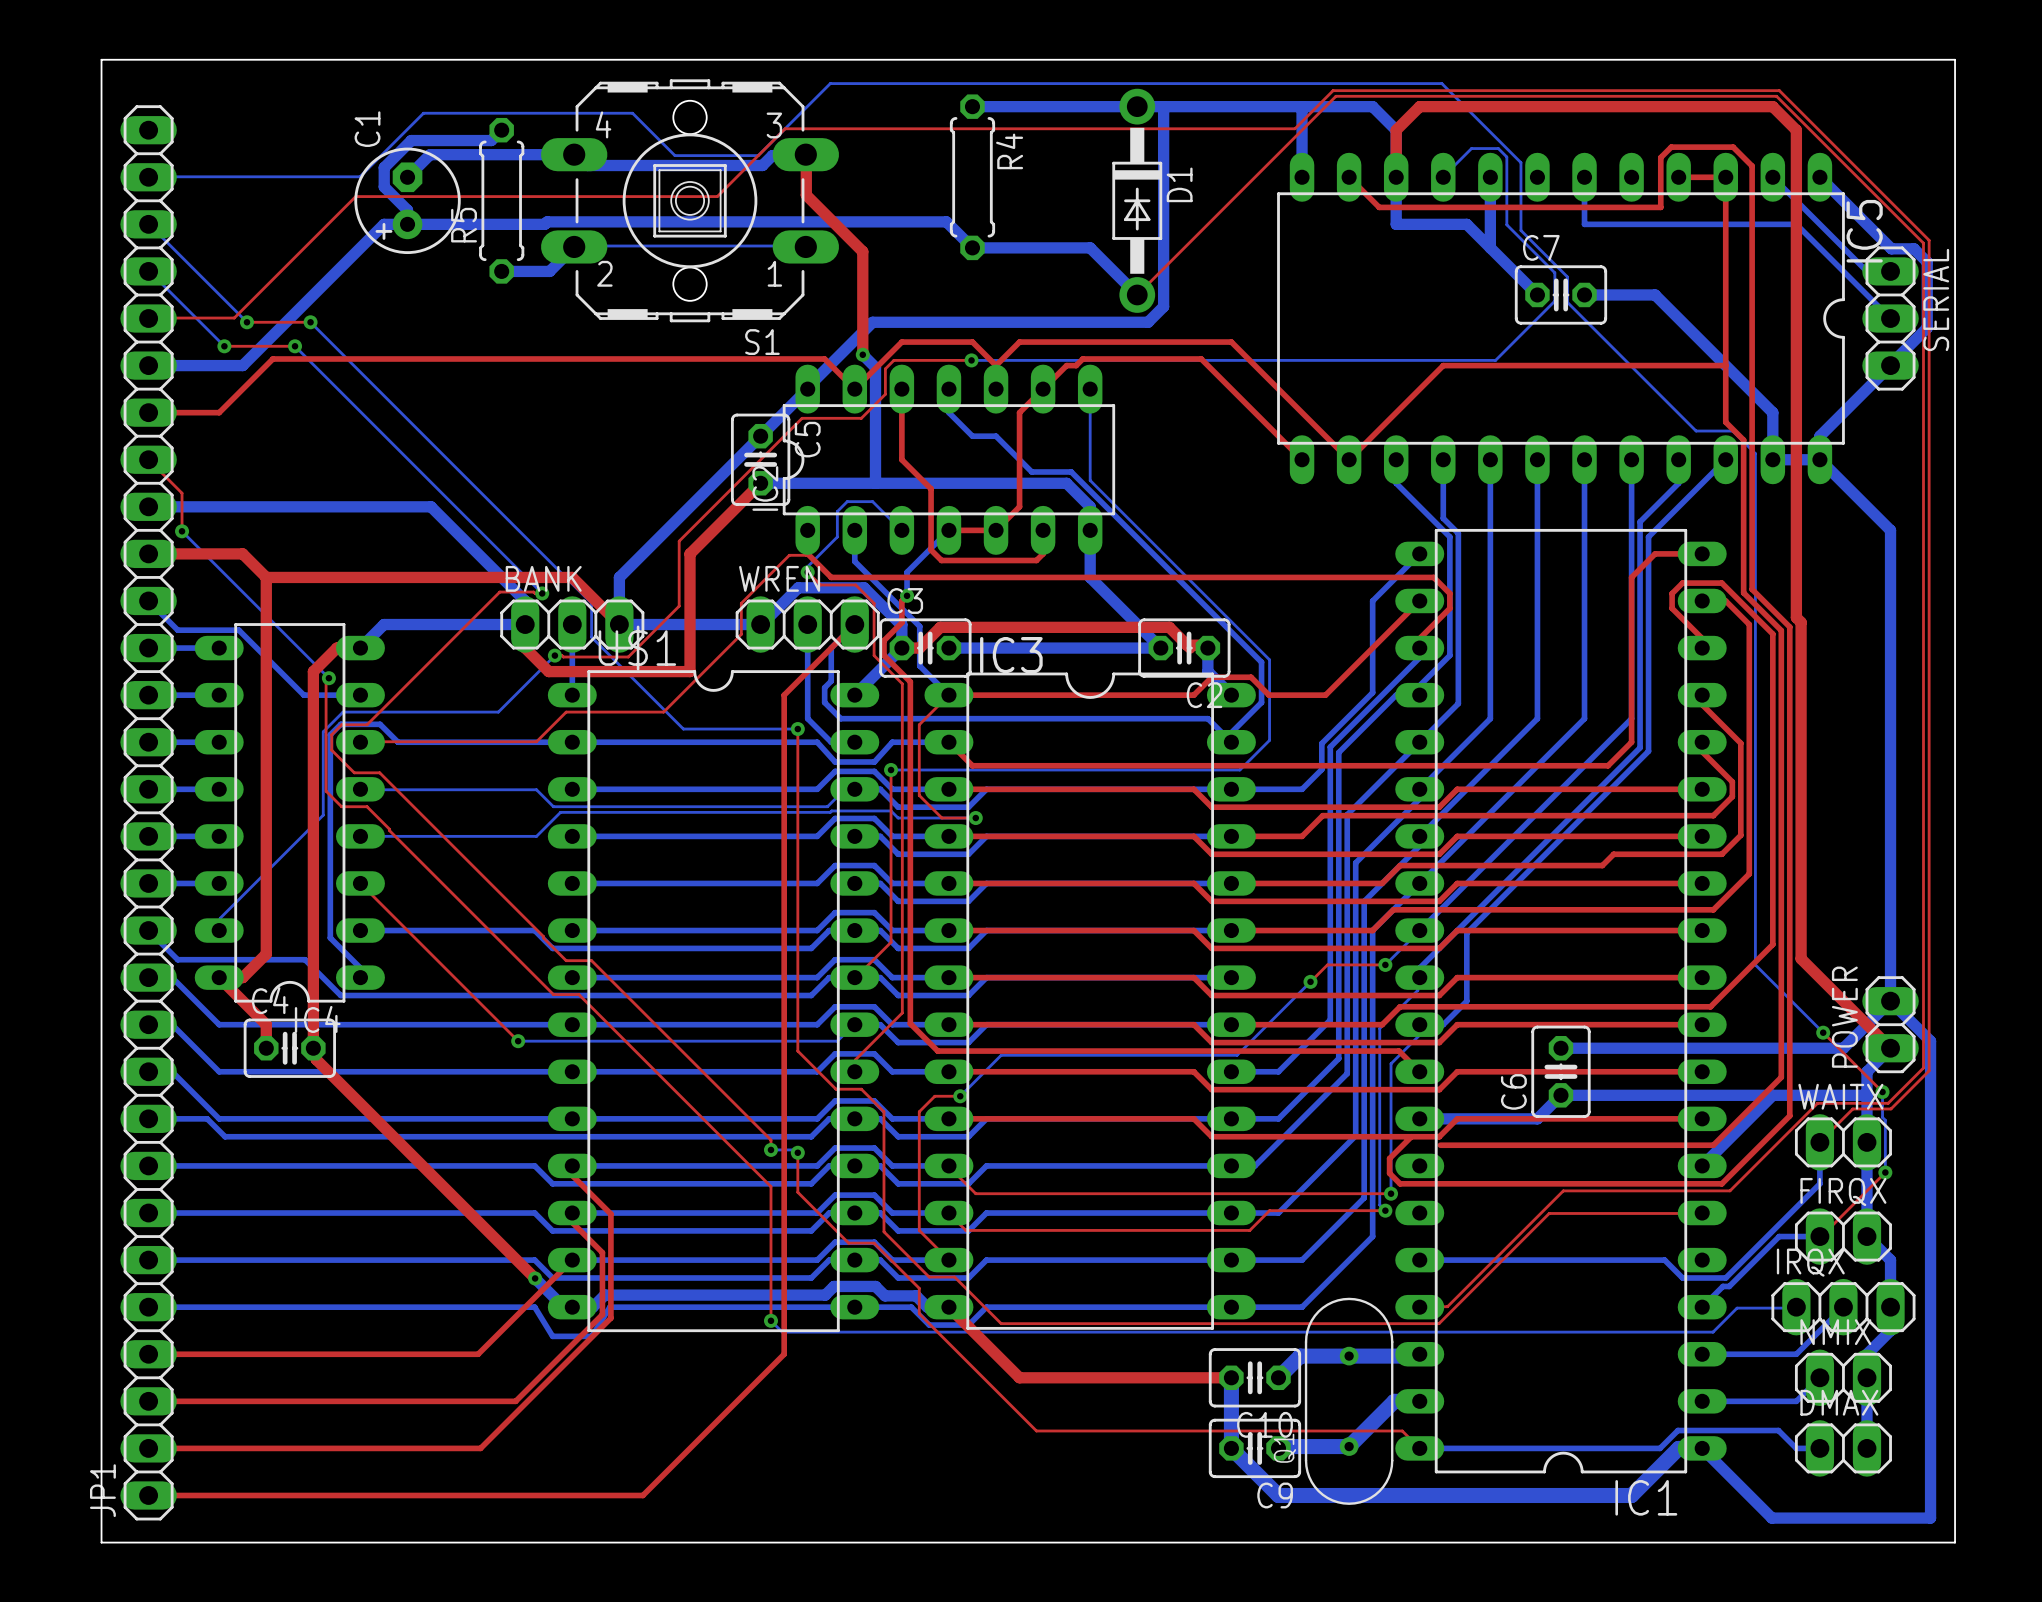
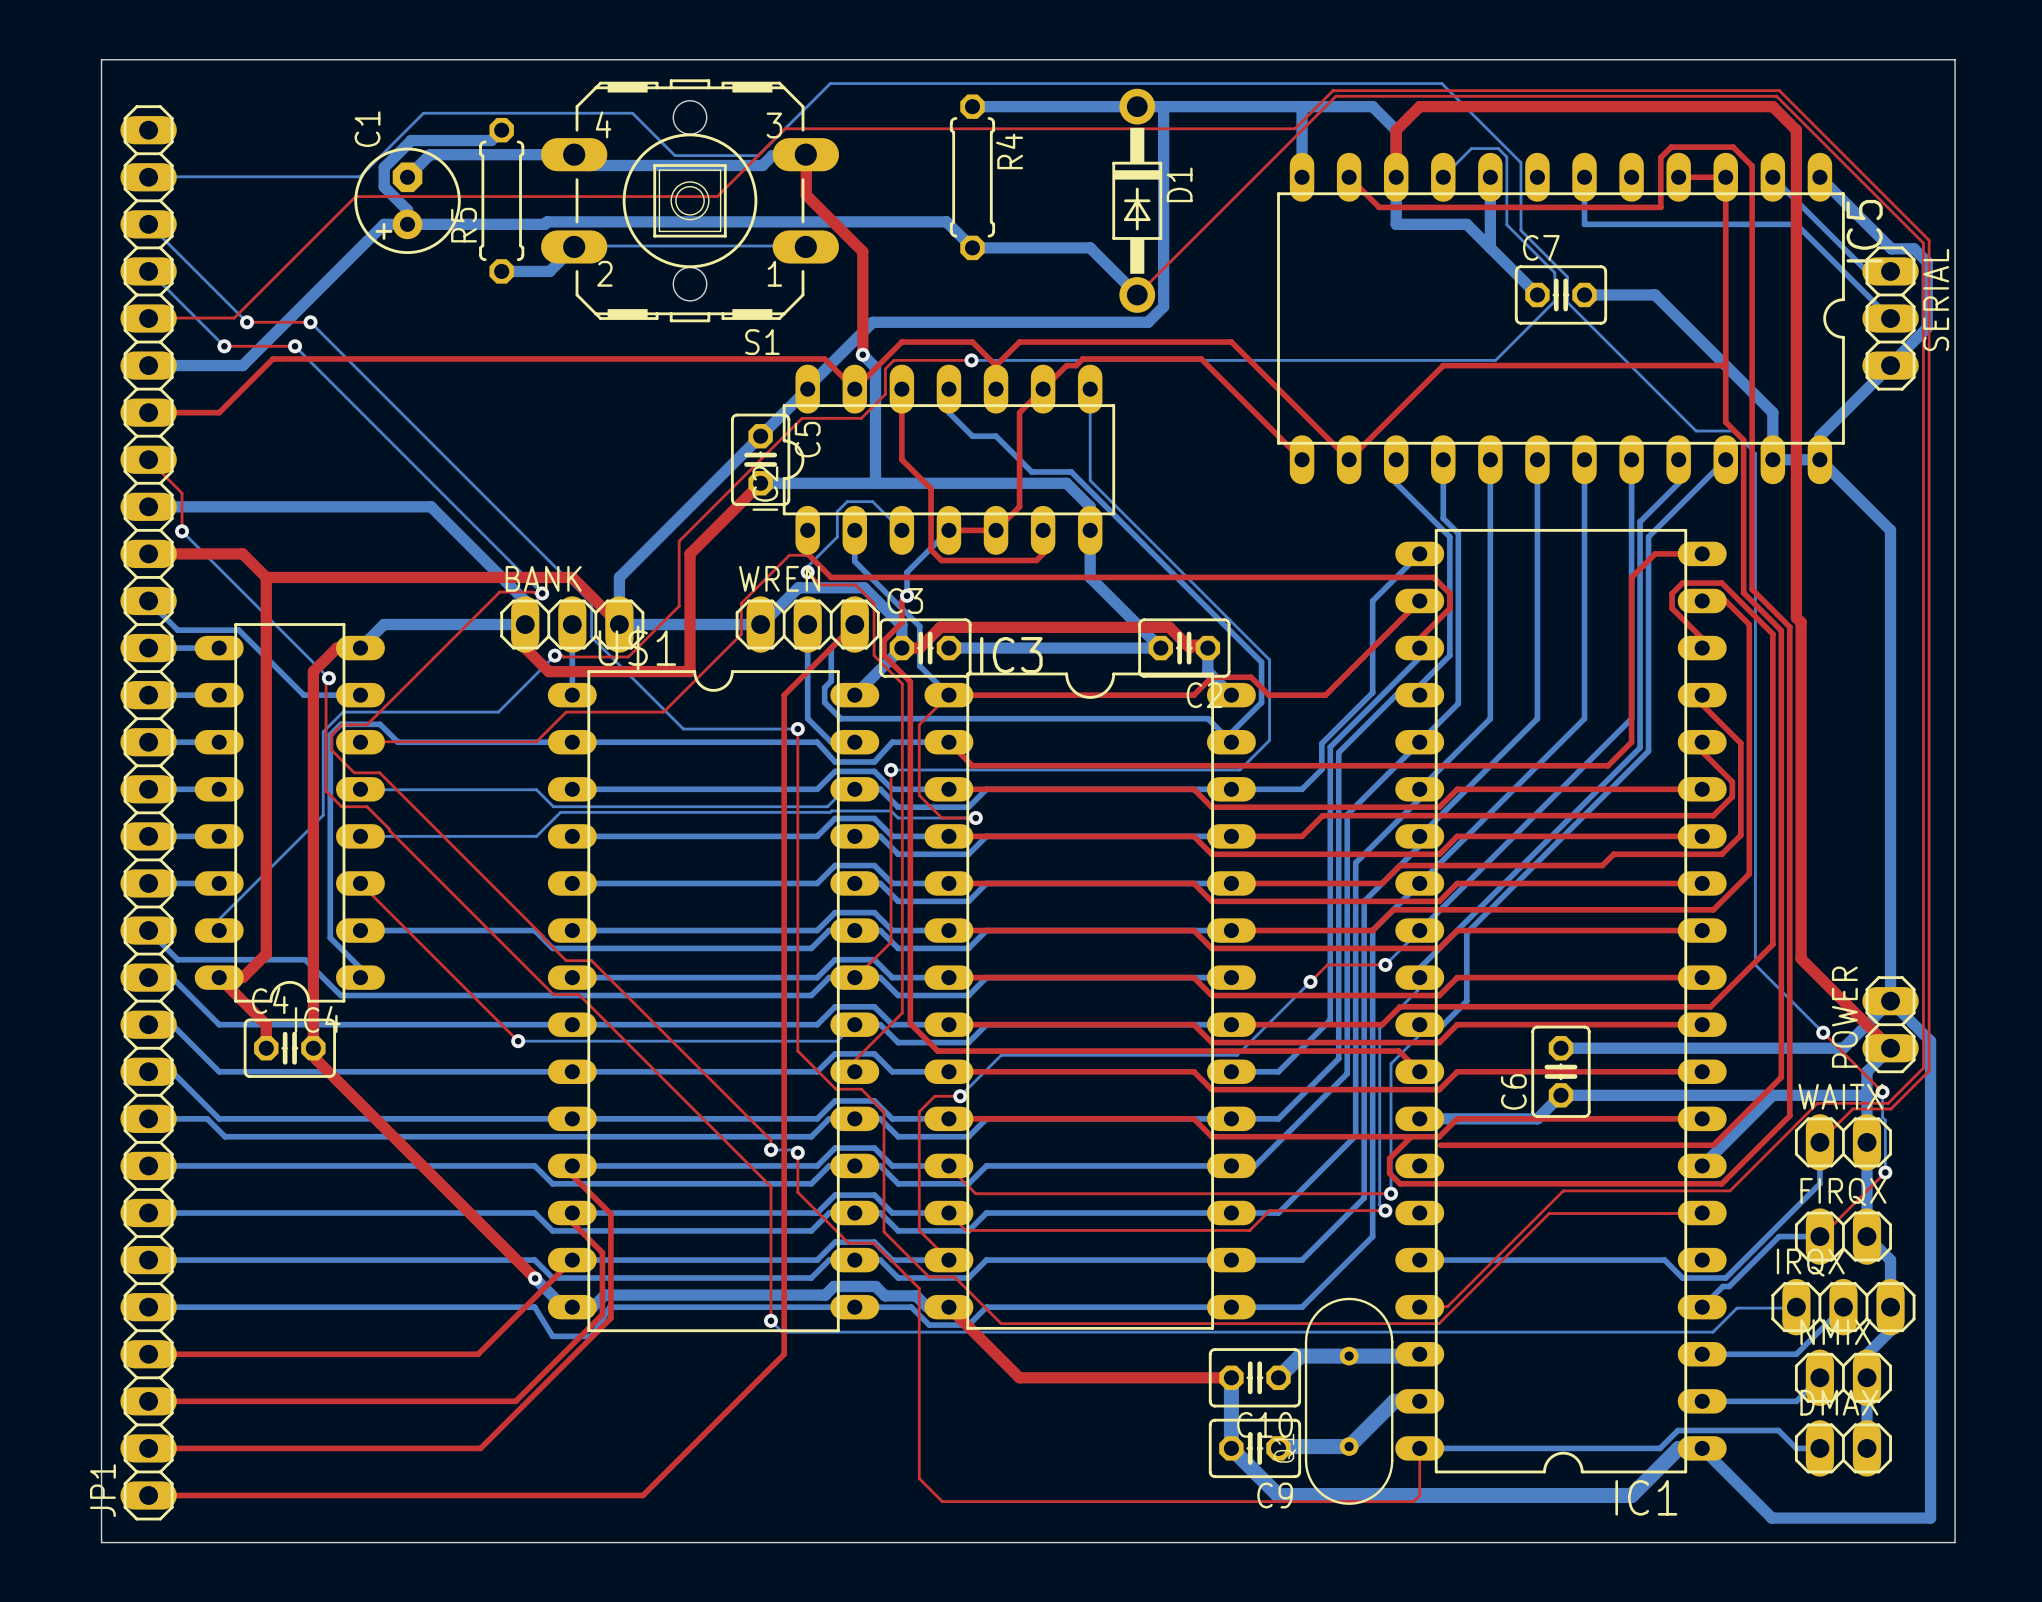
top track: (919, 1313) (1036, 1430) (1402, 1430) (1419, 1448) -> (919, 1313) (919, 1478) (942, 1501) (1413, 1501) (1419, 1495) (1419, 1448)

